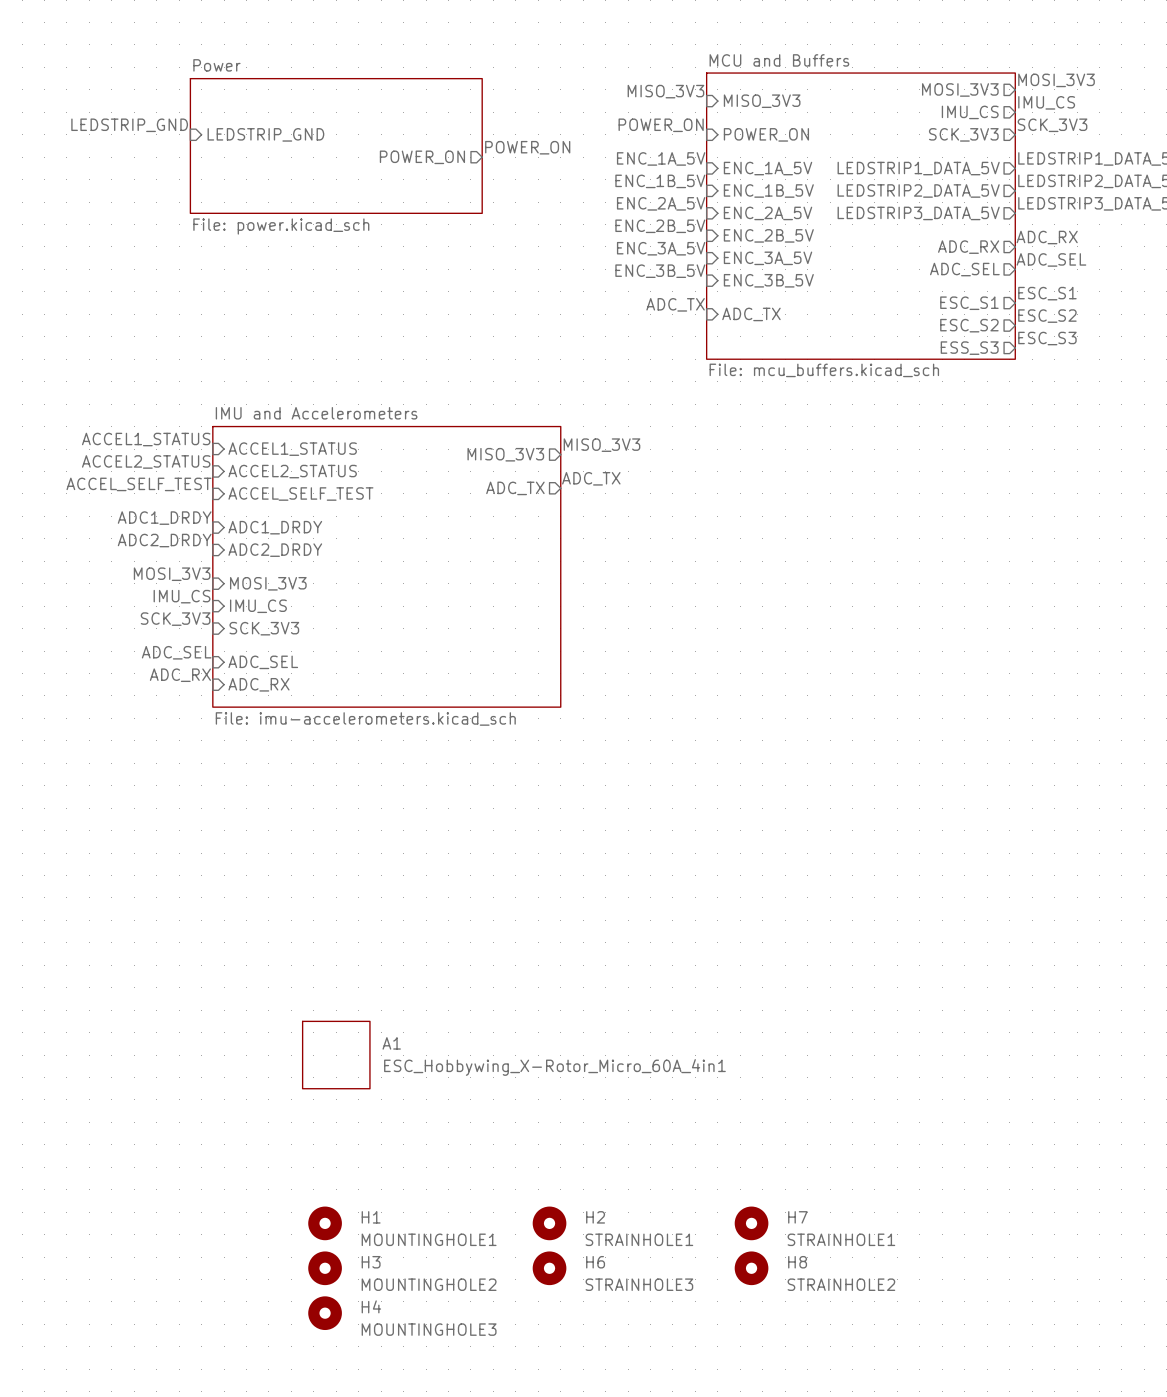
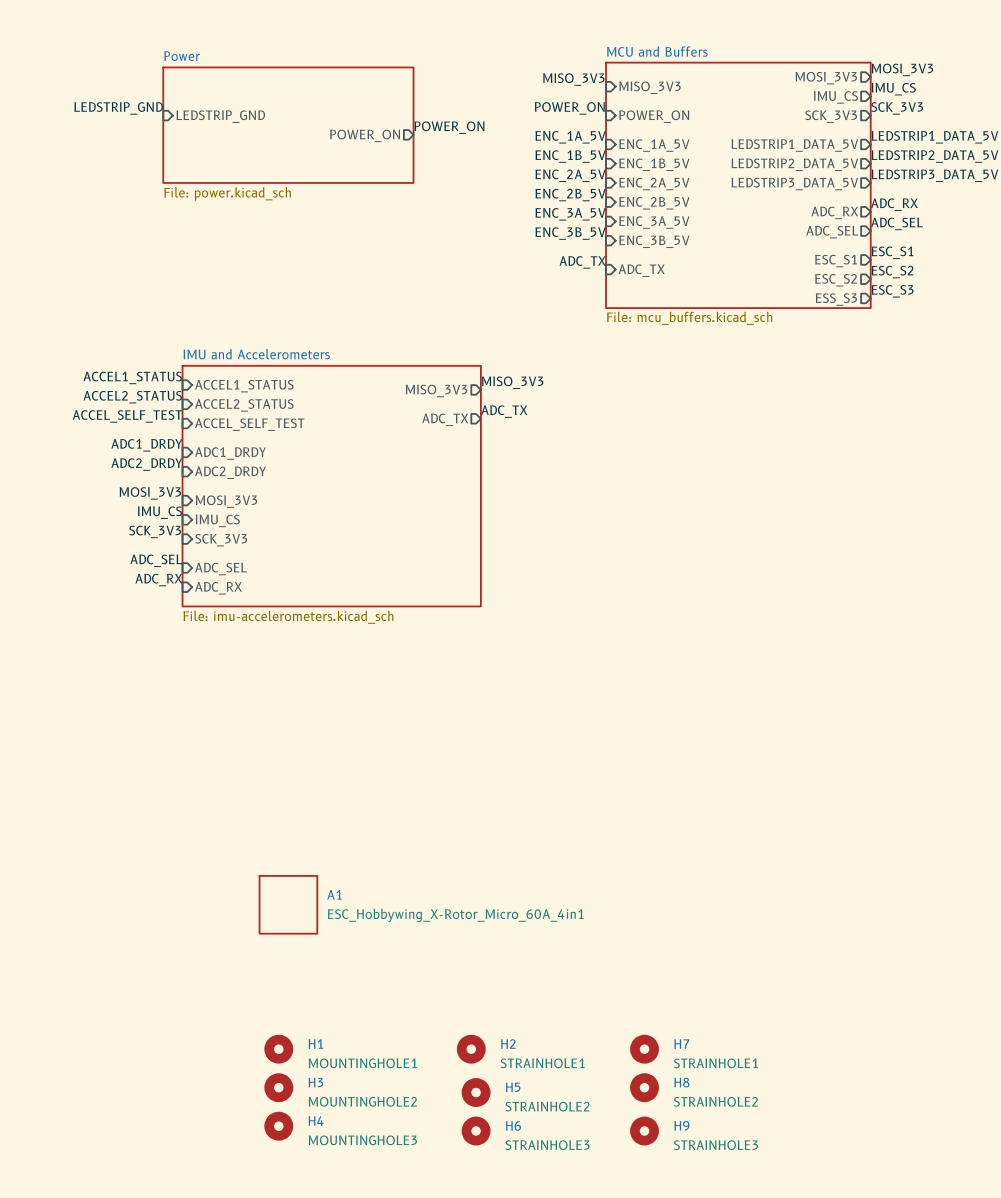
H6 position: (549, 1268) -> (476, 1131)
H5: none -> STRAINHOLE2 (476, 1092)
H9: none -> STRAINHOLE3 (644, 1131)

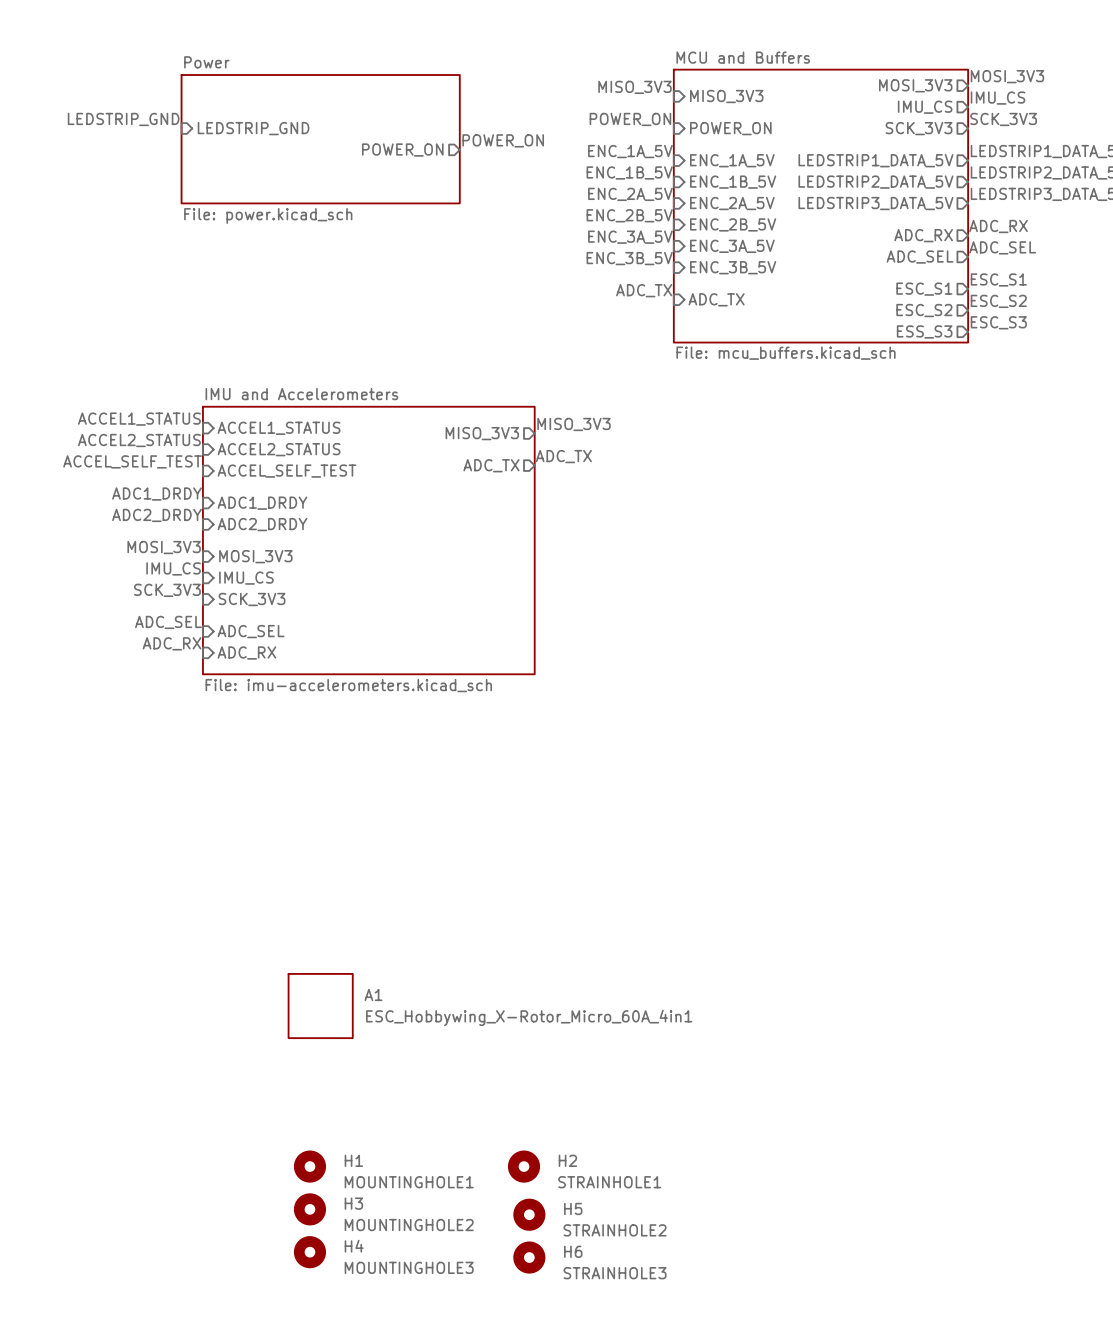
H7: STRAINHOLE1 (644, 1049) -> none
H8: STRAINHOLE2 (644, 1087) -> none
H9: STRAINHOLE3 (644, 1131) -> none

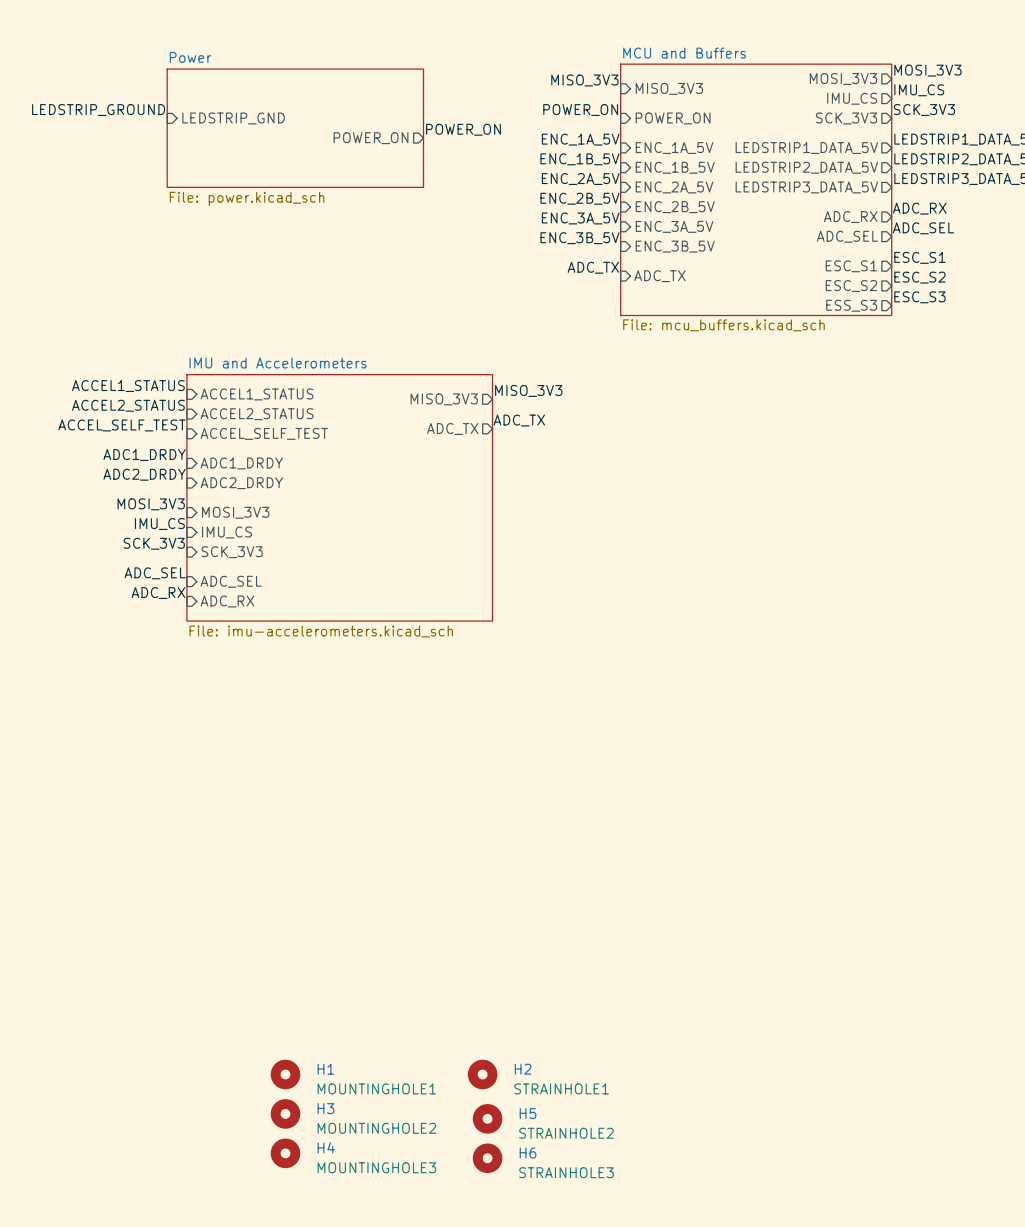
label: LEDSTRIP_GND (123, 119) -> LEDSTRIP_GROUND (98, 110)
A1: ESC_Hobbywing_X-Rotor_Micro_60A_4in1 (320, 1006) -> none

